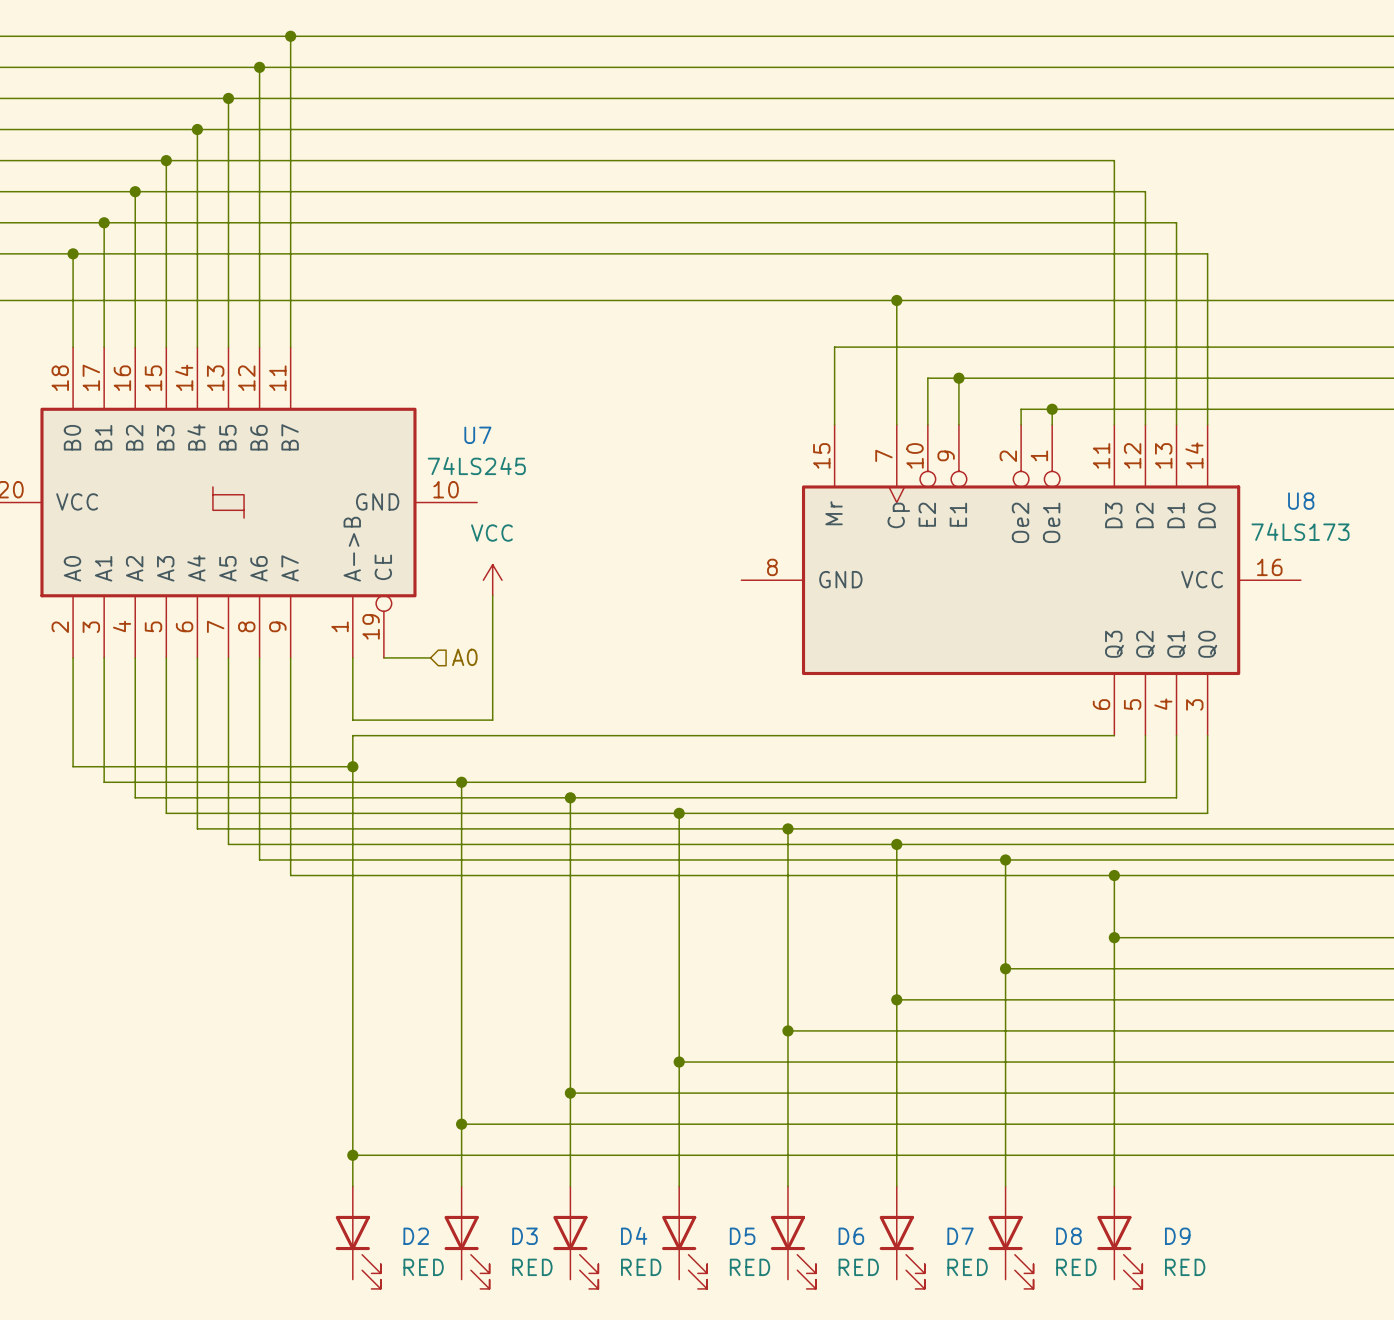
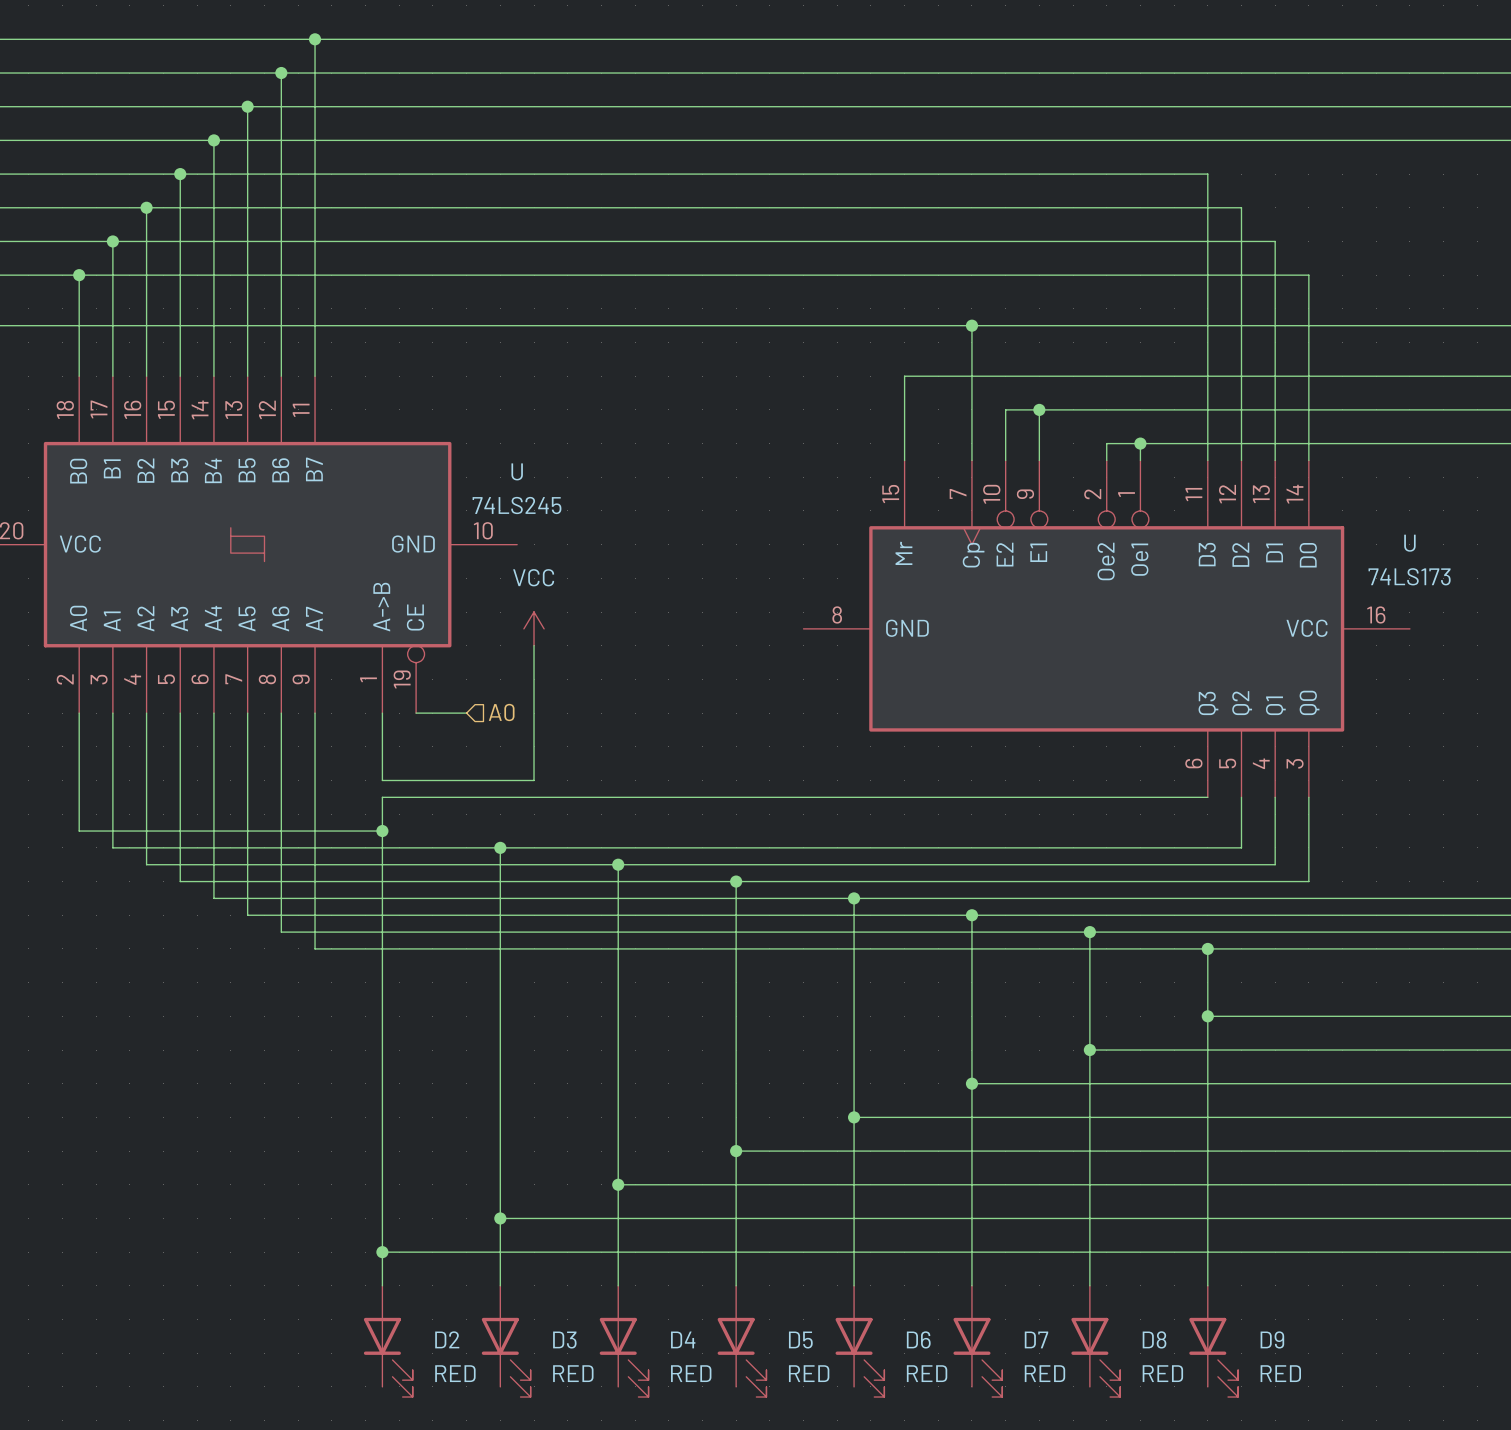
U7 name: U7 (477, 435) -> U (517, 471)
U8 name: U8 (1301, 501) -> U (1409, 543)

